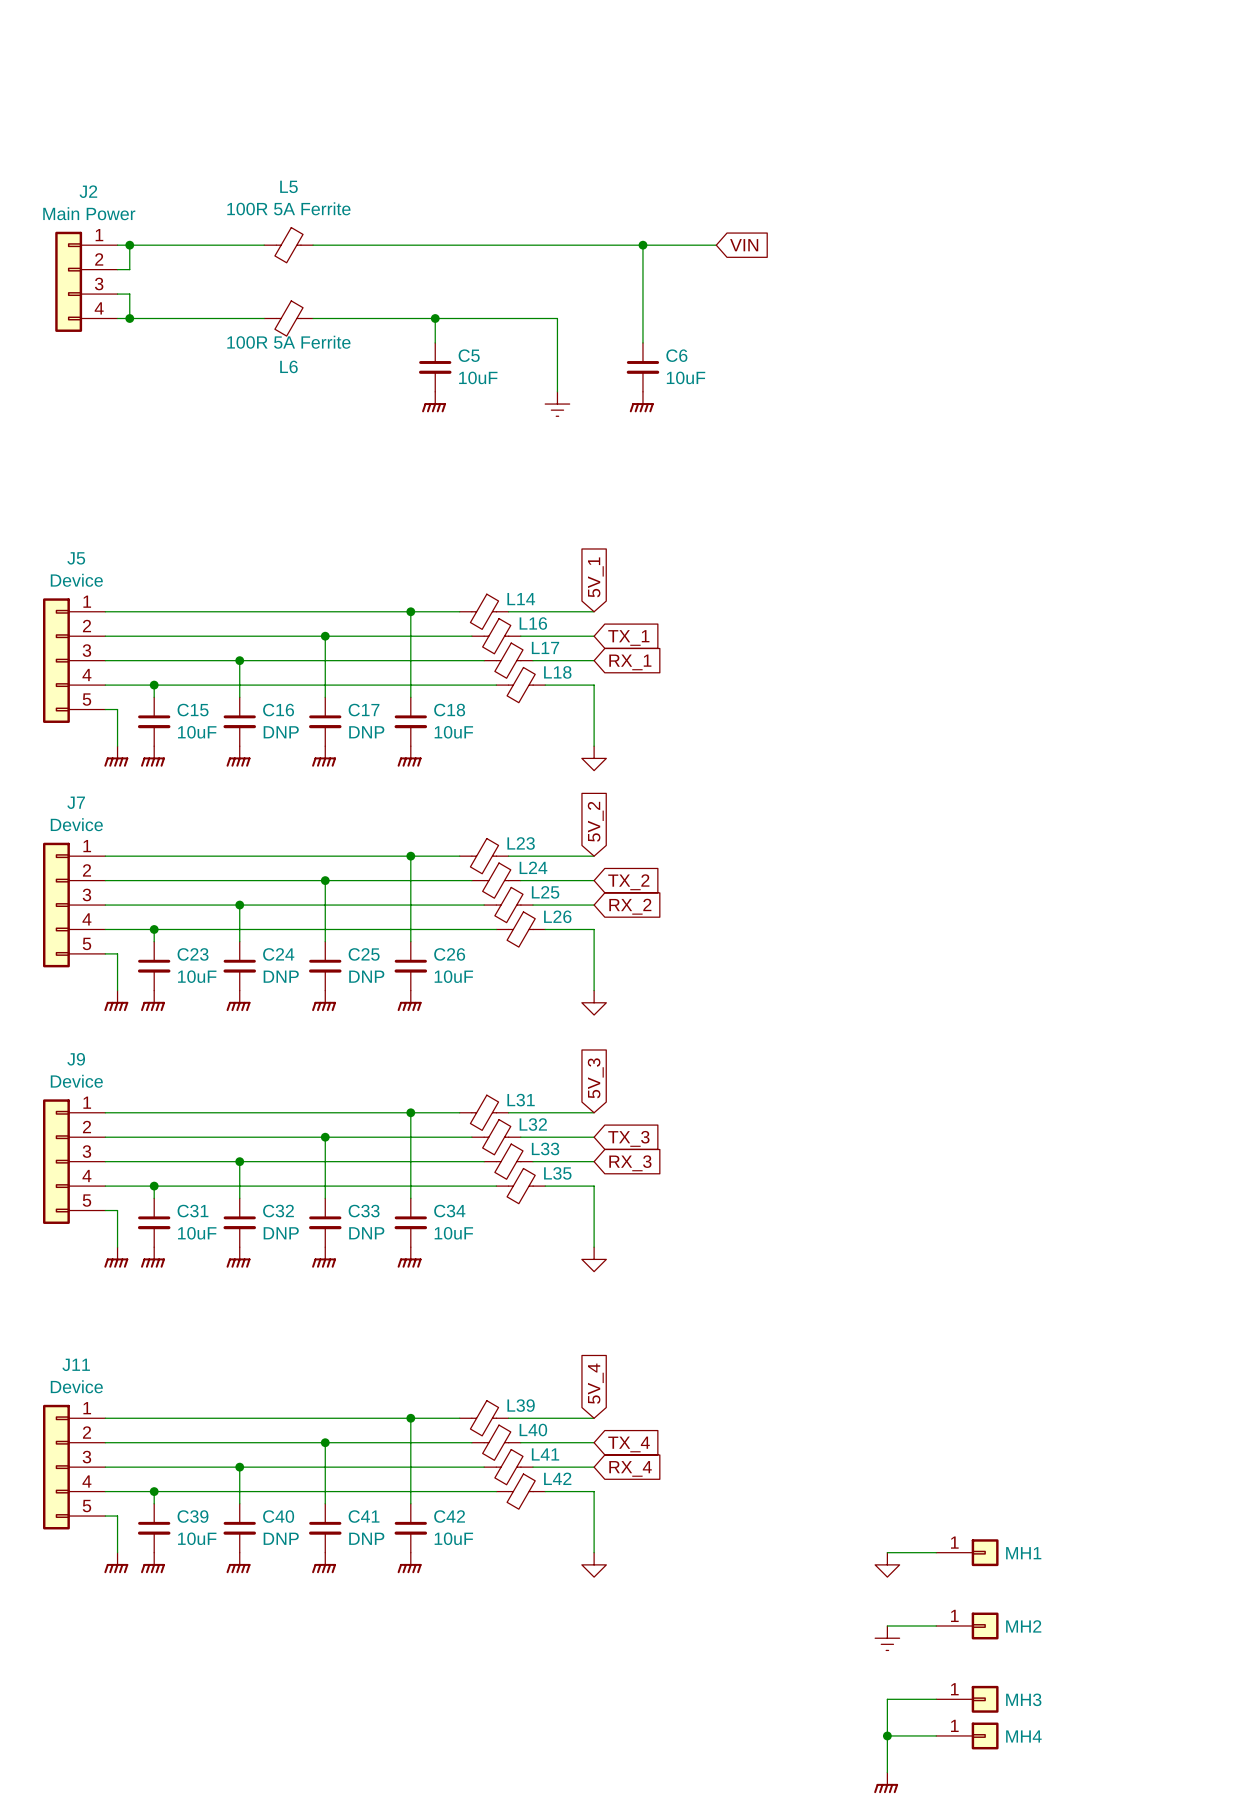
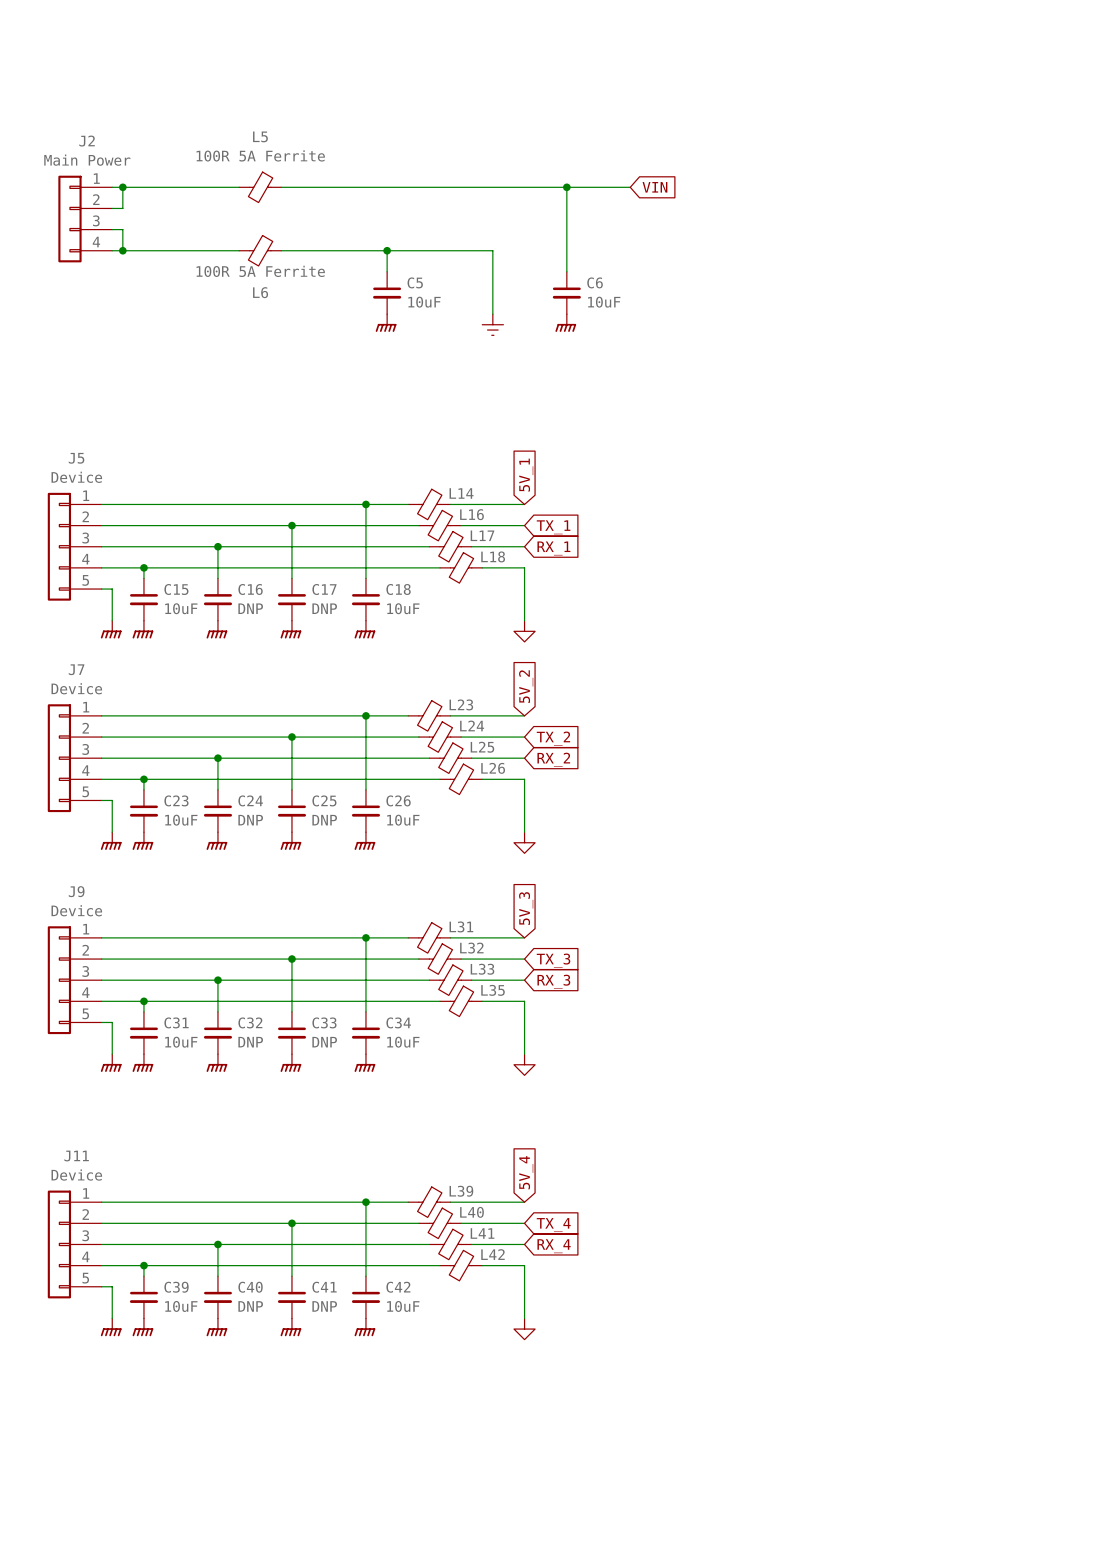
wire: (887, 1552) (936, 1552) -> none
MH1: (967, 1552) -> none
power symbol: (887, 1564) -> none
wire: (887, 1625) (936, 1625) -> none
MH2: (967, 1625) -> none
power symbol: (887, 1638) -> none
wire: (936, 1699) (887, 1699) (887, 1772) -> none
MH3: (967, 1699) -> none
wire: (887, 1735) (936, 1735) -> none
junction: (887, 1735) -> none
MH4: (967, 1735) -> none
power symbol: (886, 1782) -> none

